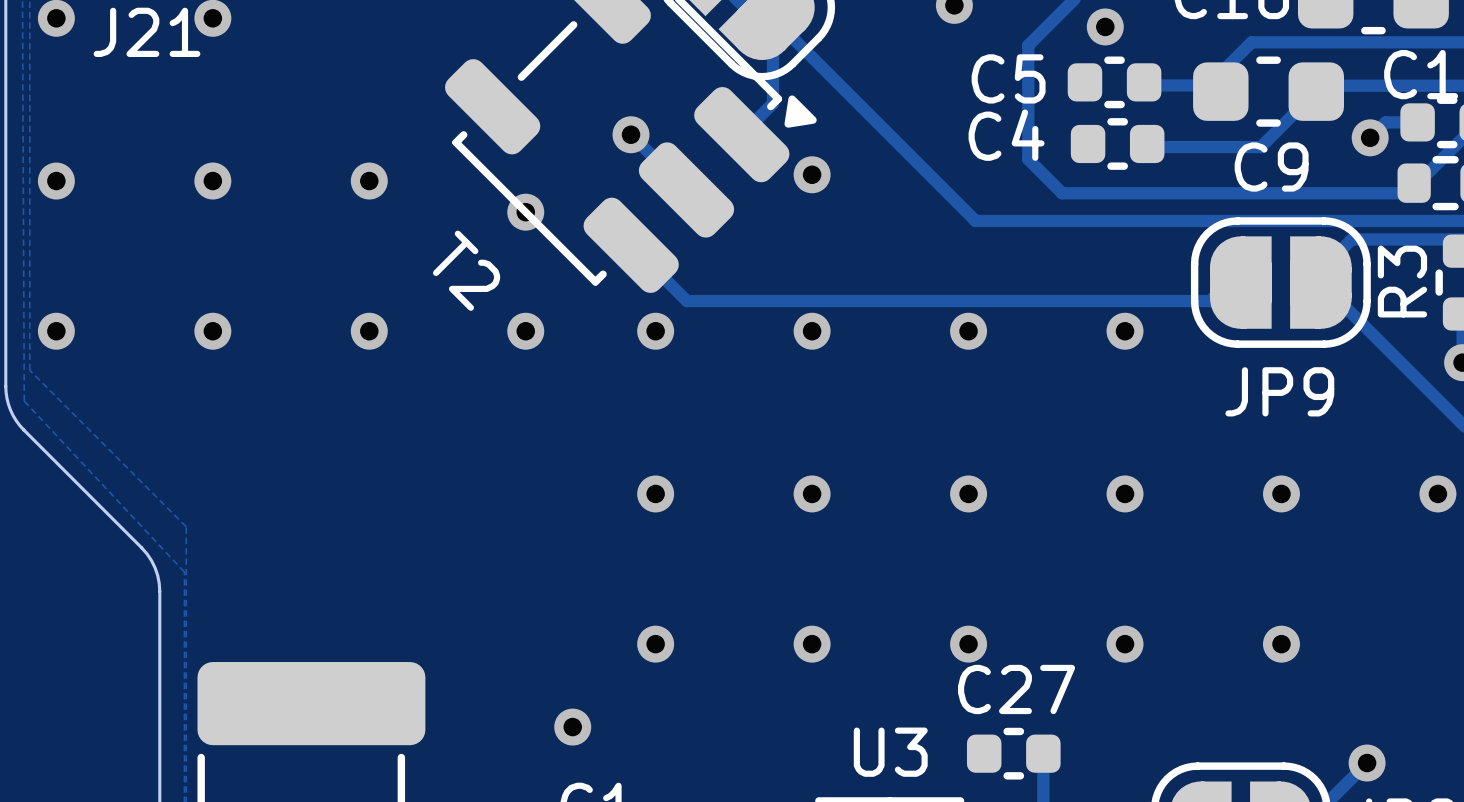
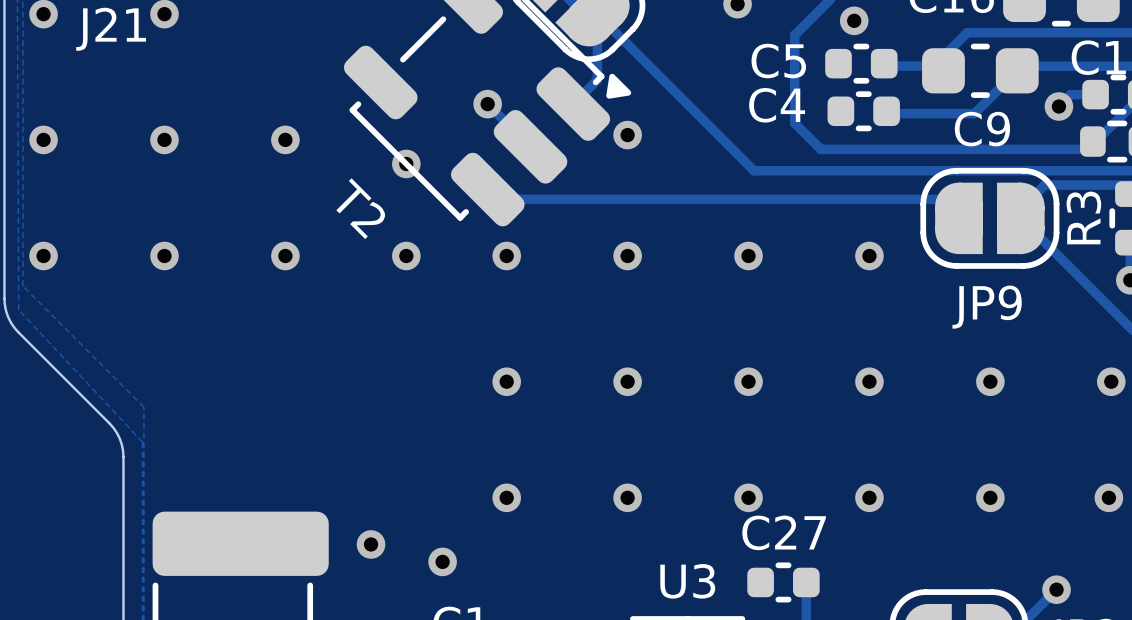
track: (643, 257) (686, 301) (1210, 301) (1240, 270) -> (497, 199) (949, 199) (958, 208)
via: none -> (1108, 497)
via: none -> (371, 544)

